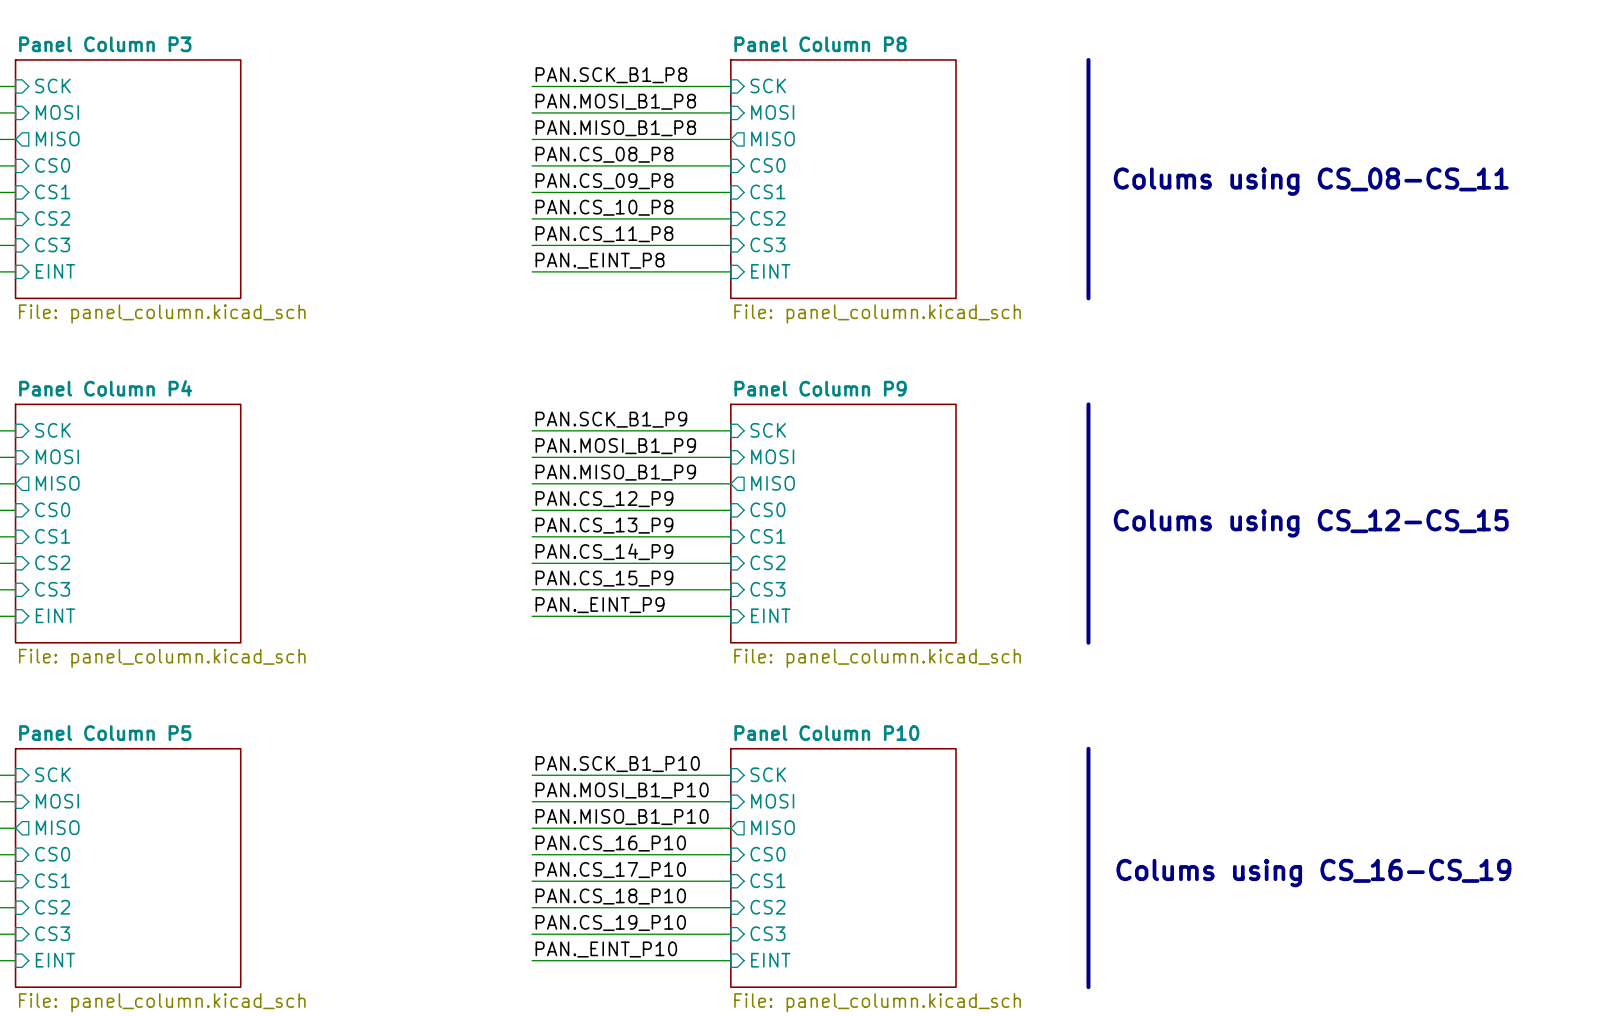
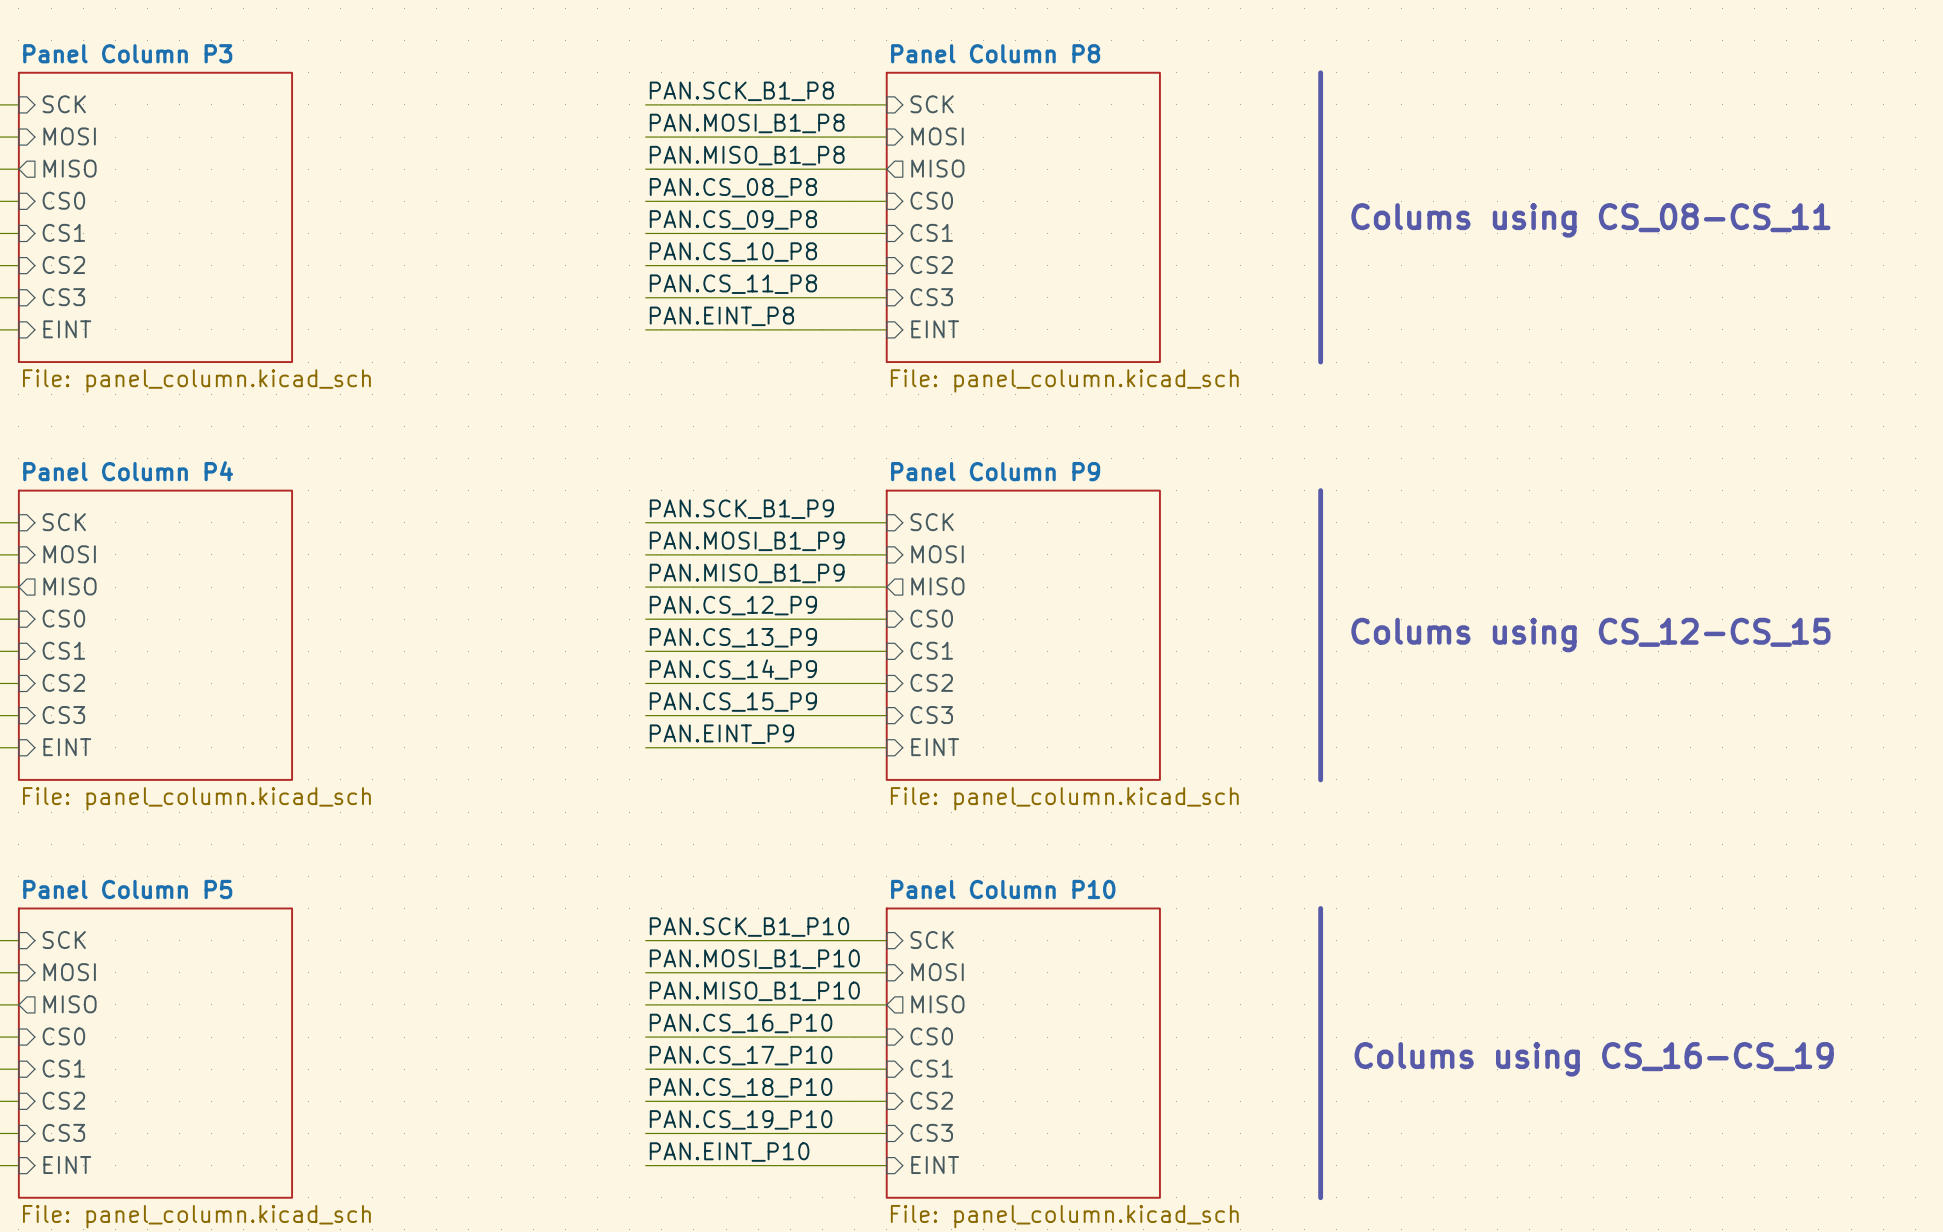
label: PAN._EINT_P8 (600, 260) -> PAN.EINT_P8 (721, 316)
label: PAN._EINT_P9 (600, 605) -> PAN.EINT_P9 (721, 734)
label: PAN._EINT_P10 (606, 949) -> PAN.EINT_P10 (729, 1152)

